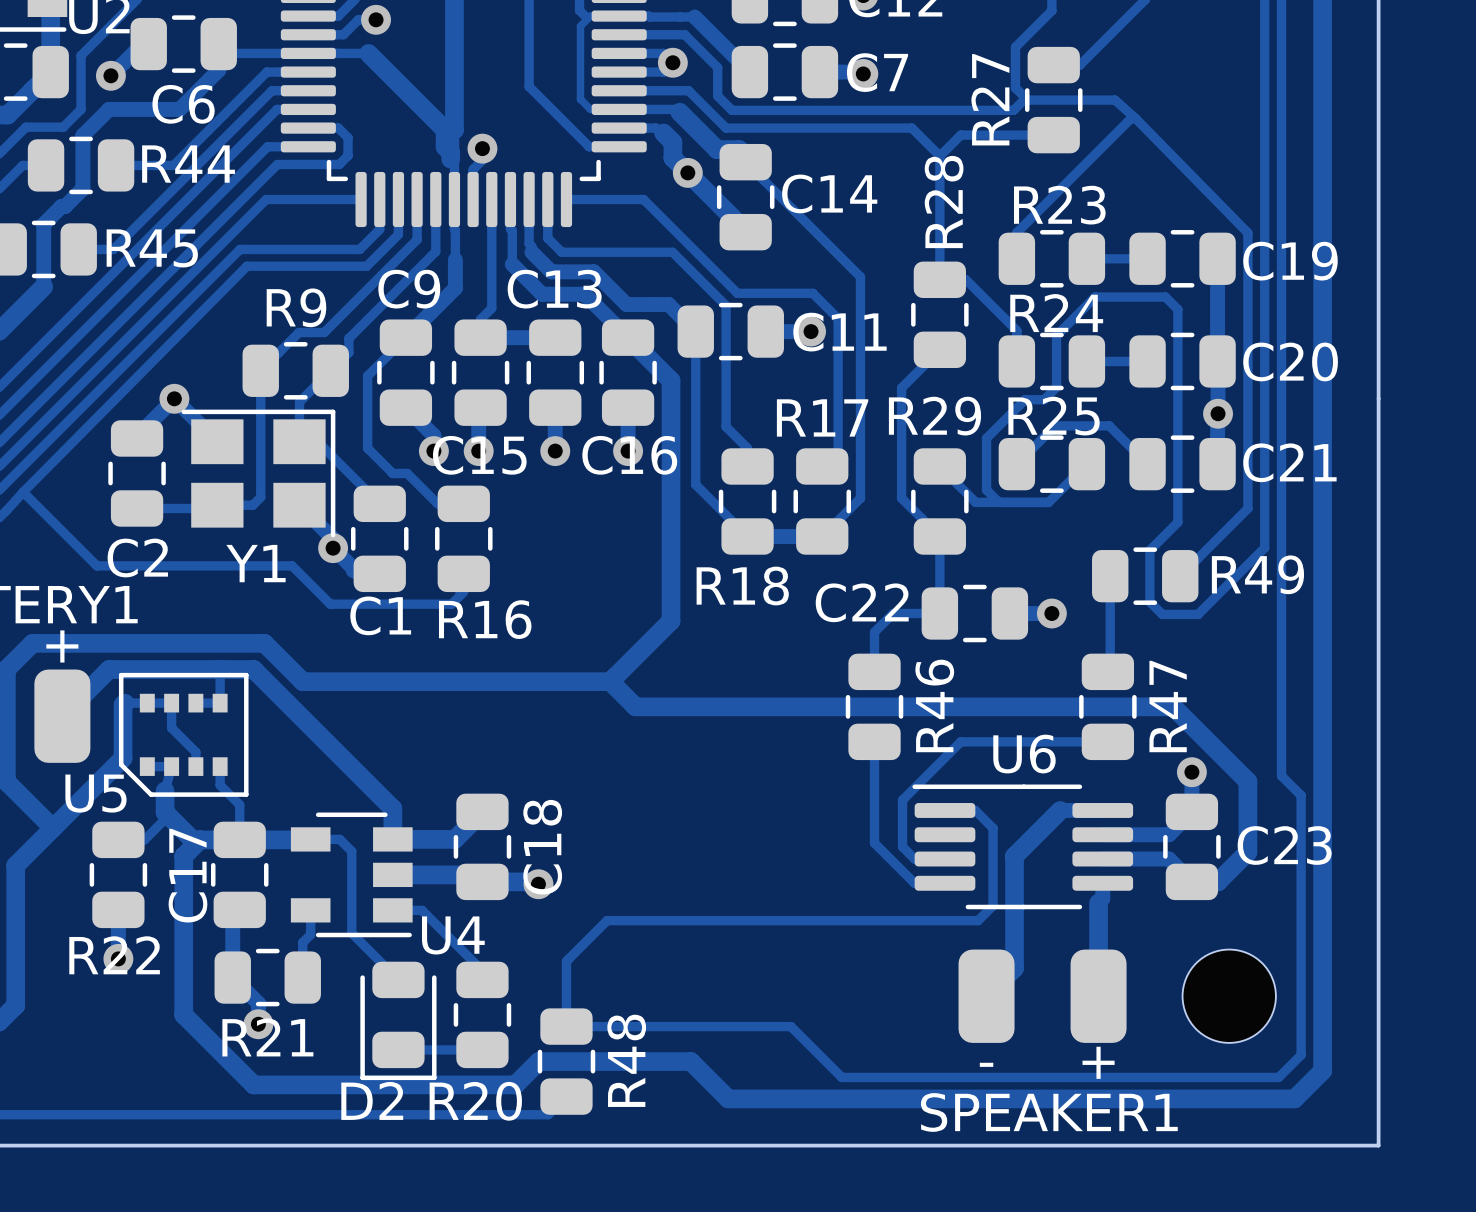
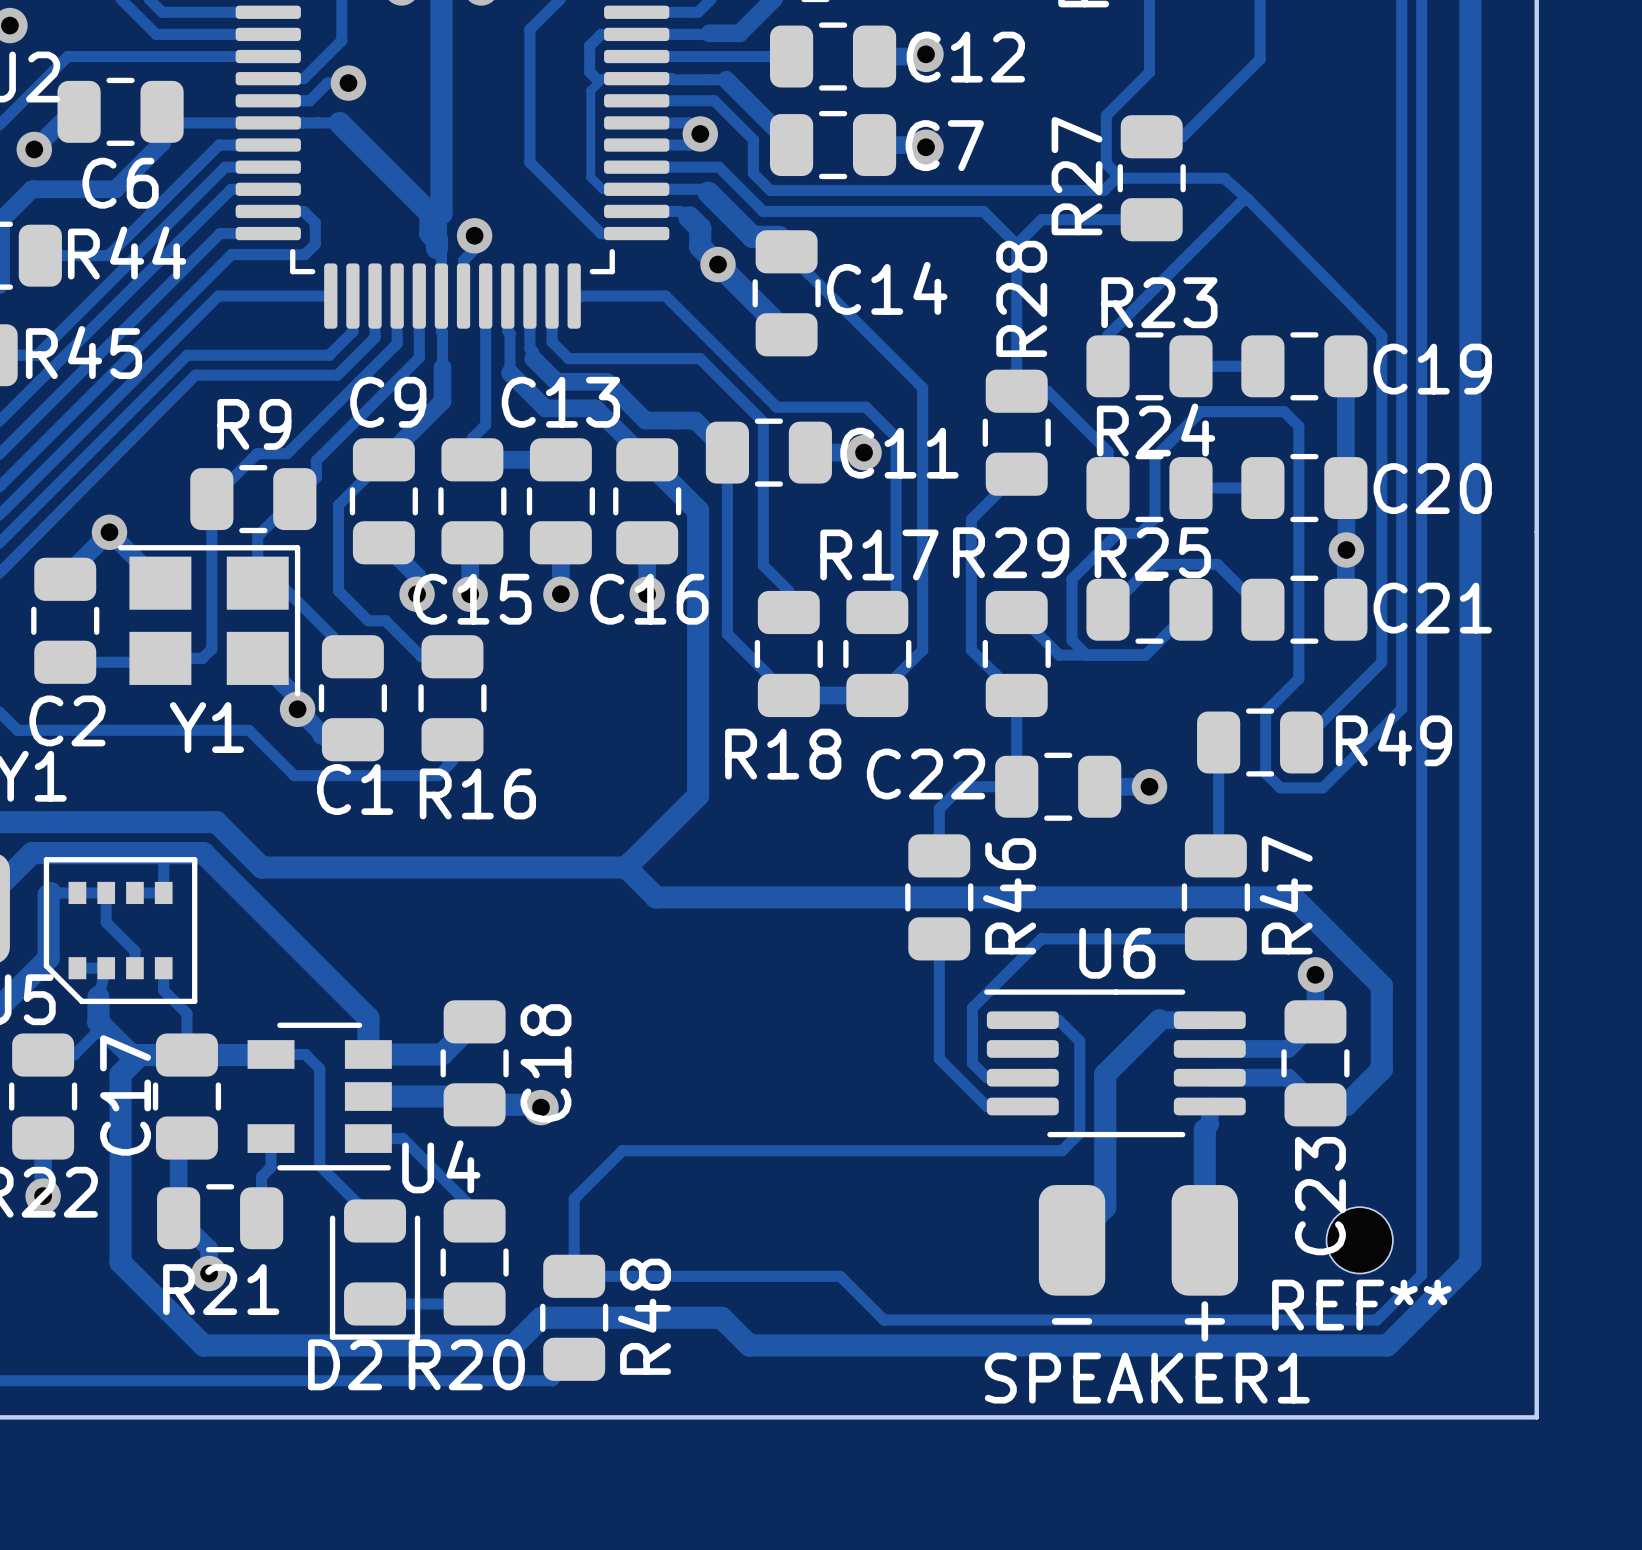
track: (1281, 775) (1301, 795) (1301, 1055) (1278, 1077) (841, 1077) (827, 1063) -> (1421, 979) (1421, 1275) (1376, 1320) (883, 1320)
C23 name rotation: 0° (1284, 845) -> 90° counterclockwise (1320, 1196)
C23 name position: C23 (1284, 845) -> C23 (1320, 1196)
part: (1229, 996) -> none
REF**: none -> (1359, 1240)
track: (1322, 1014) (1322, 1070) (1294, 1098) (728, 1098) (714, 1084) -> (1470, 1262) (1387, 1345) (749, 1345)

